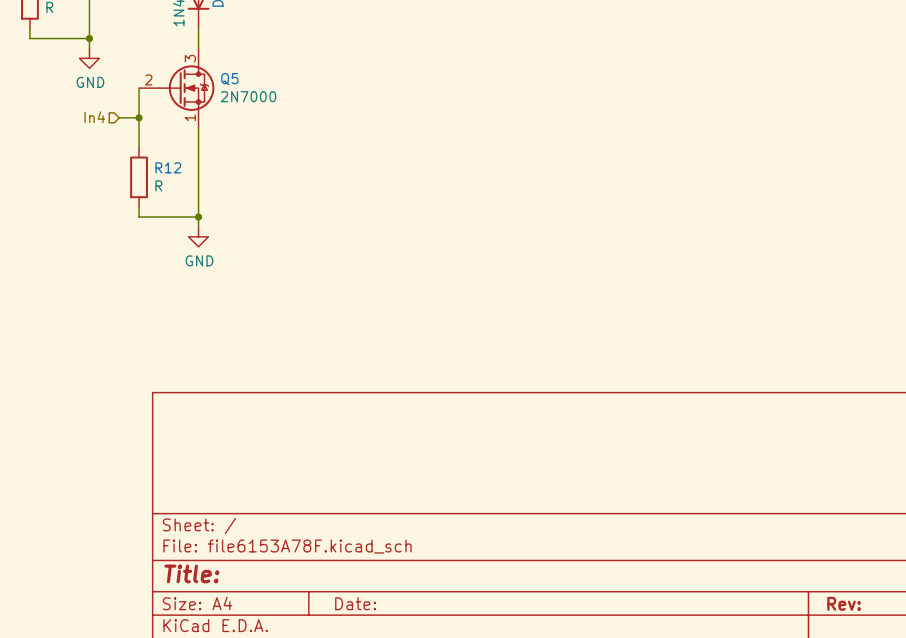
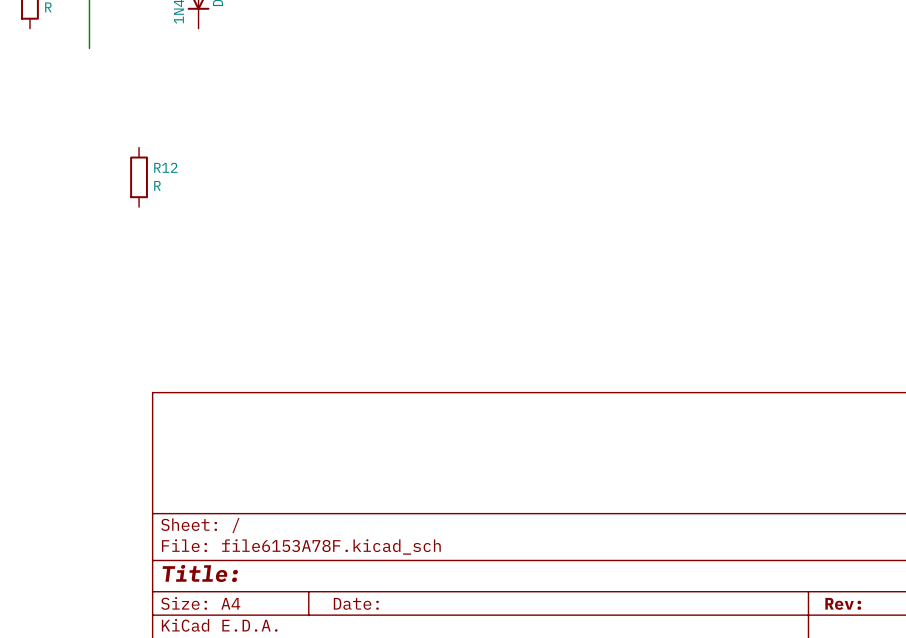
wire: (29, 28) (29, 38) (89, 38) -> none
wire: (198, 28) (198, 48) -> none
junction: (89, 38) -> none
power symbol: GND (89, 58) -> none
wire: (139, 88) (139, 147) -> none
Q5: 2N7000 (176, 88) -> none
hierarchical label: In4 (94, 117) -> none
wire: (119, 117) (139, 117) -> none
junction: (139, 117) -> none
wire: (198, 127) (198, 226) -> none
wire: (139, 207) (139, 217) (198, 217) -> none
junction: (198, 217) -> none
power symbol: GND (198, 236) -> none

